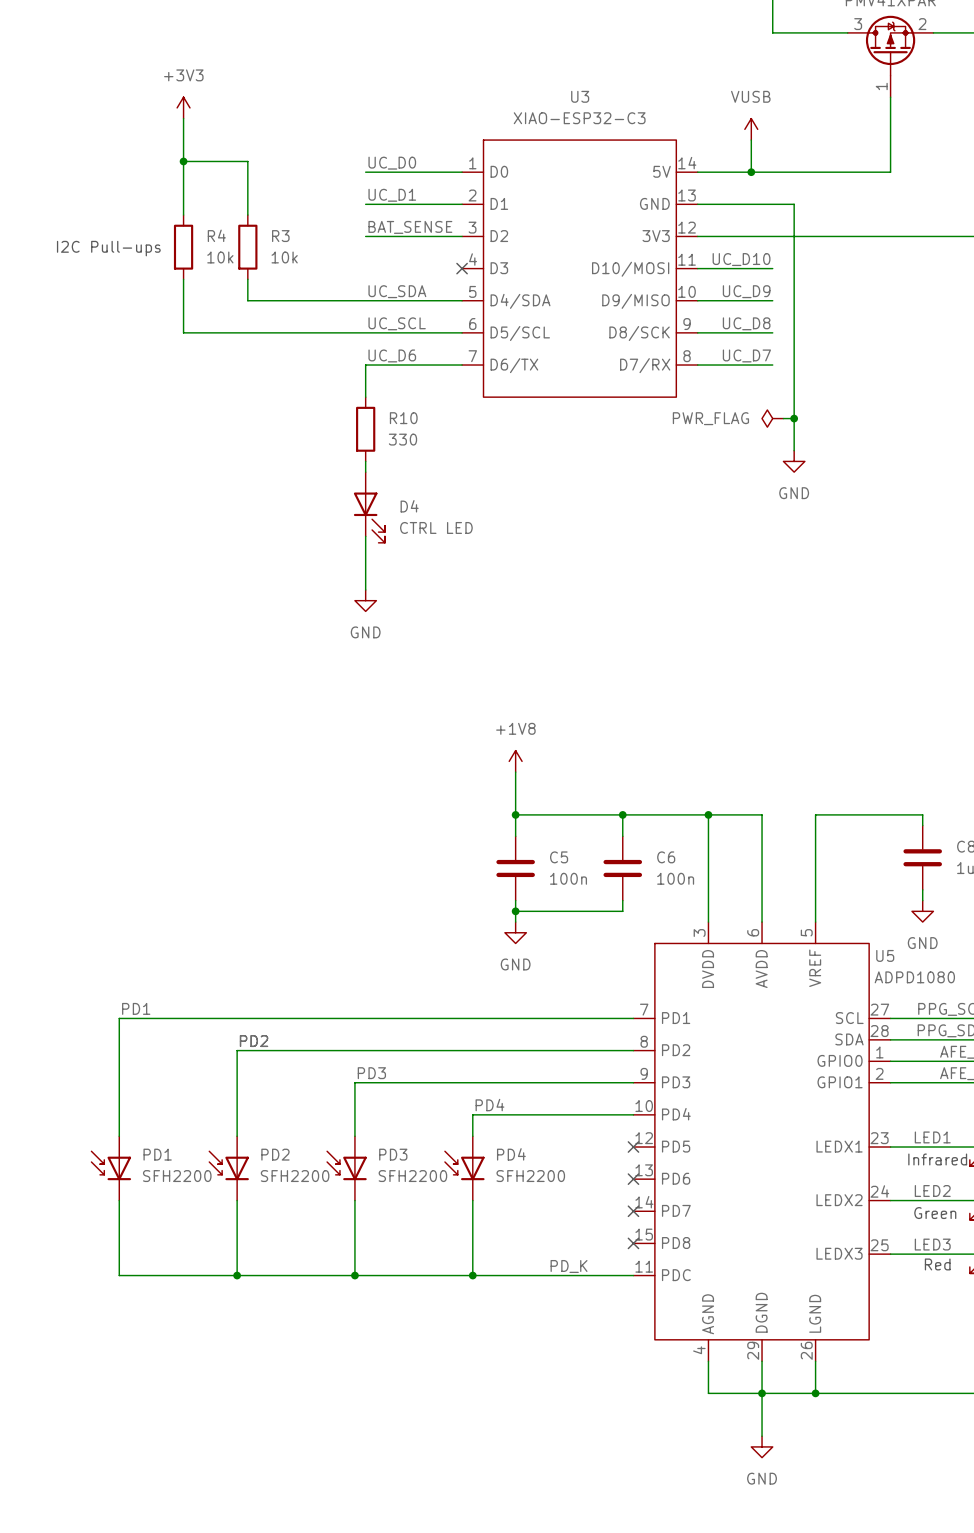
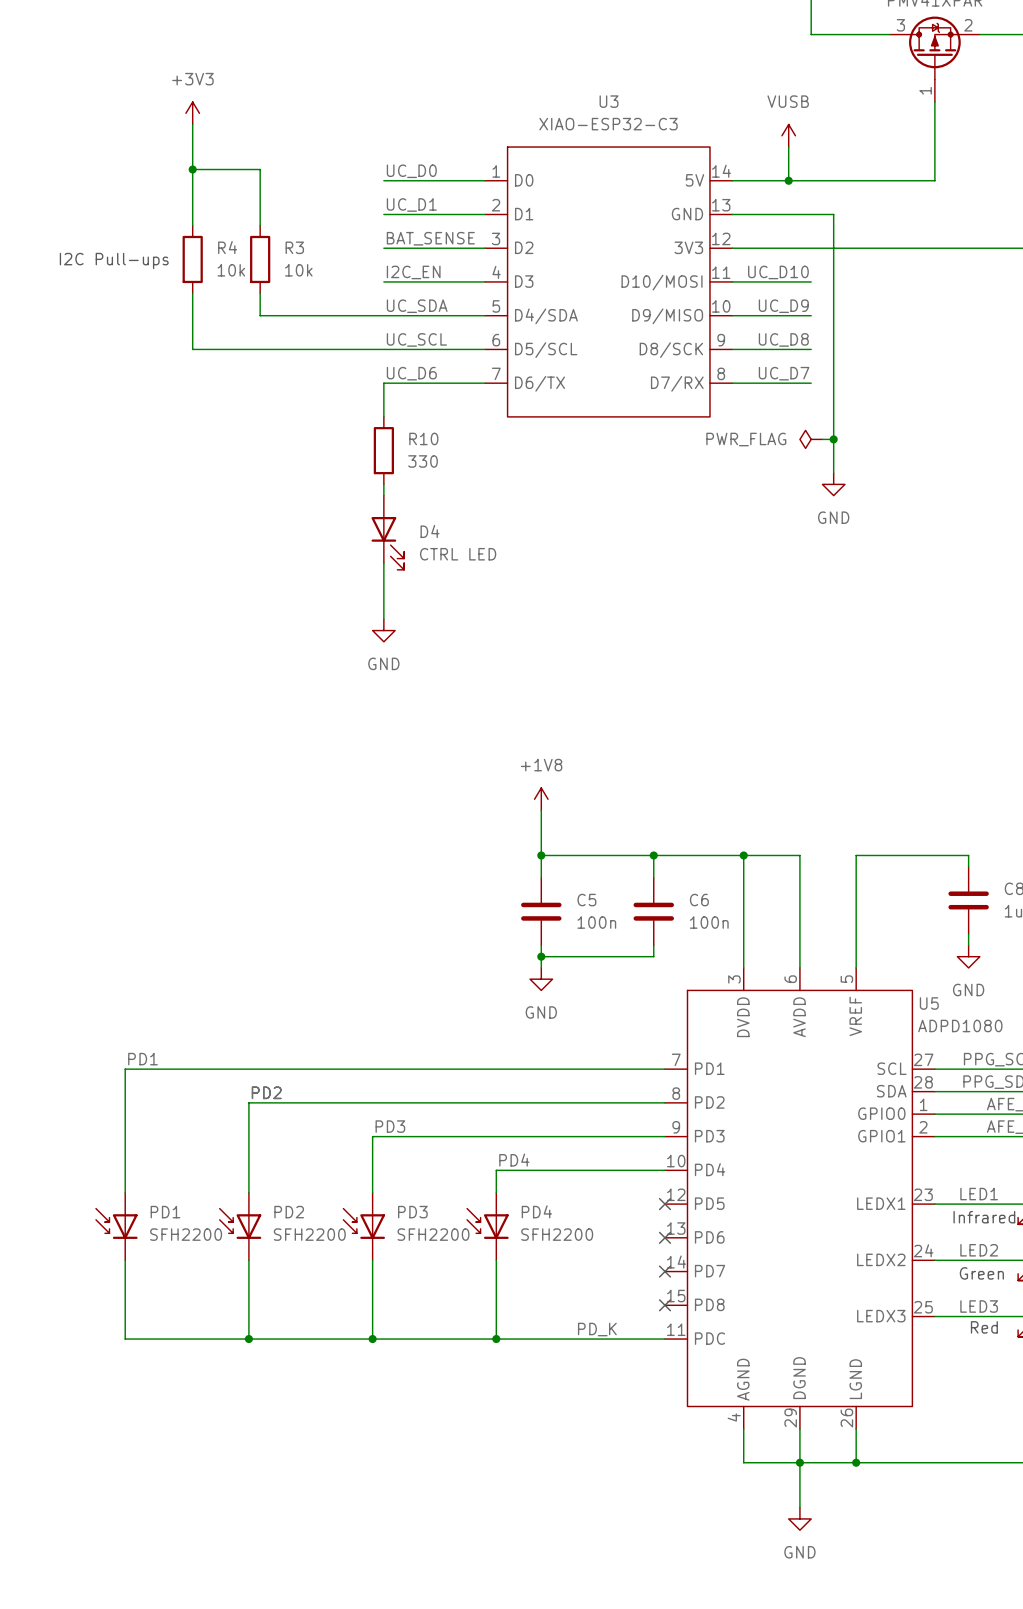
label: none -> I2C_EN (413, 272)
wire: none -> (383, 281) (485, 281)
no-connect mark: (462, 268) -> none

